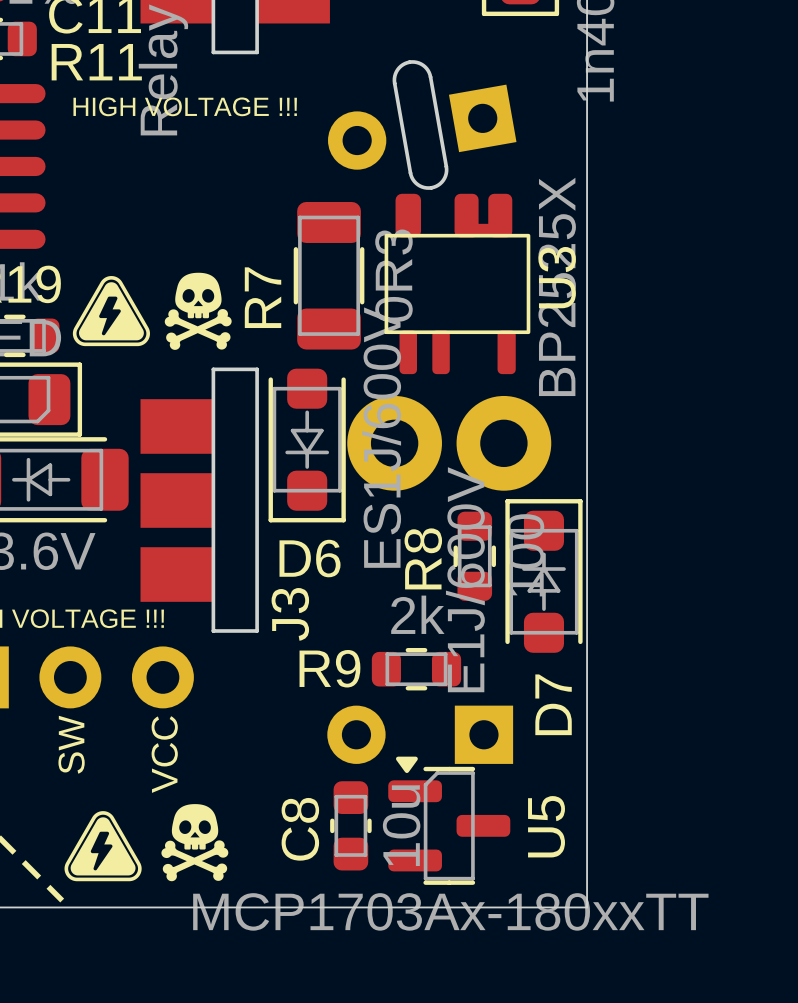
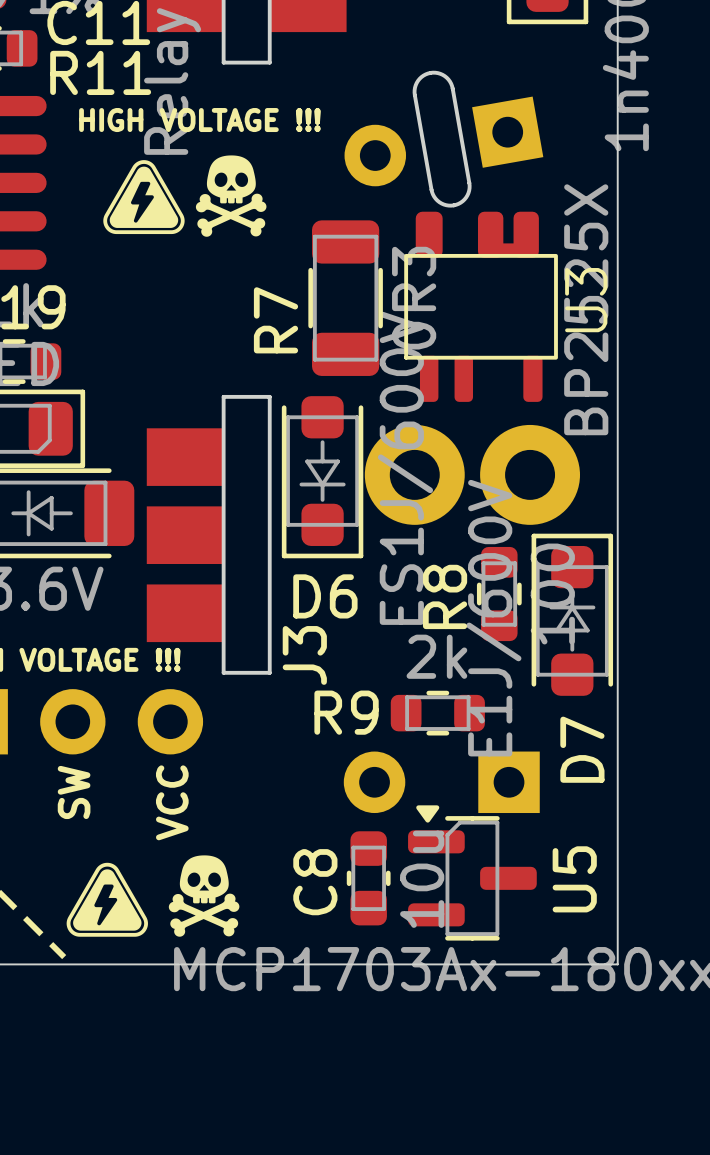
drawing position: (198, 295) -> (231, 179)
drawing position: (111, 311) -> (143, 197)
drawing position: (111, 311) -> (143, 197)
drawing position: (198, 329) -> (231, 215)

